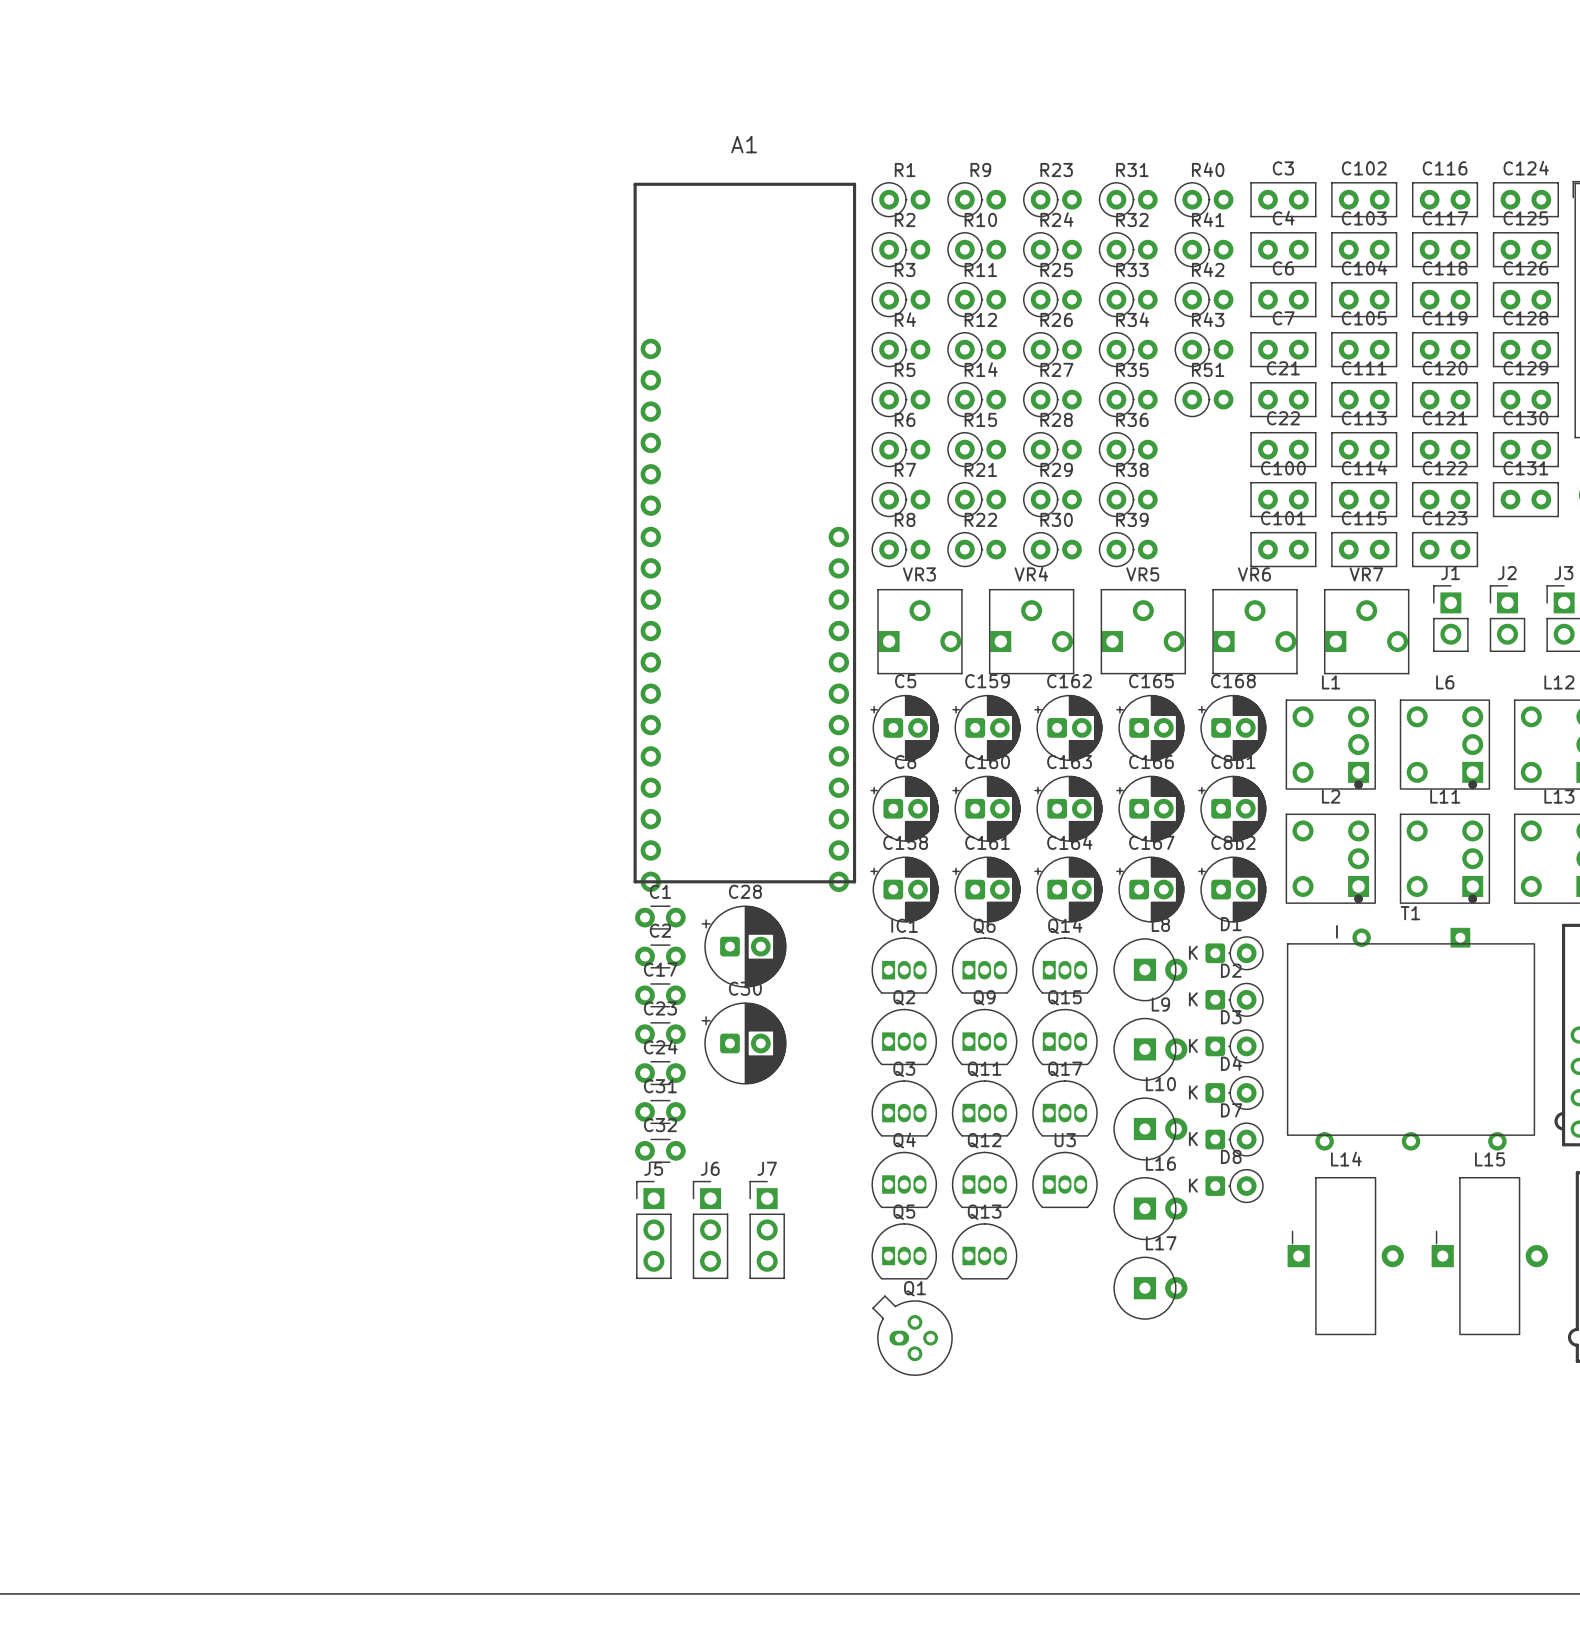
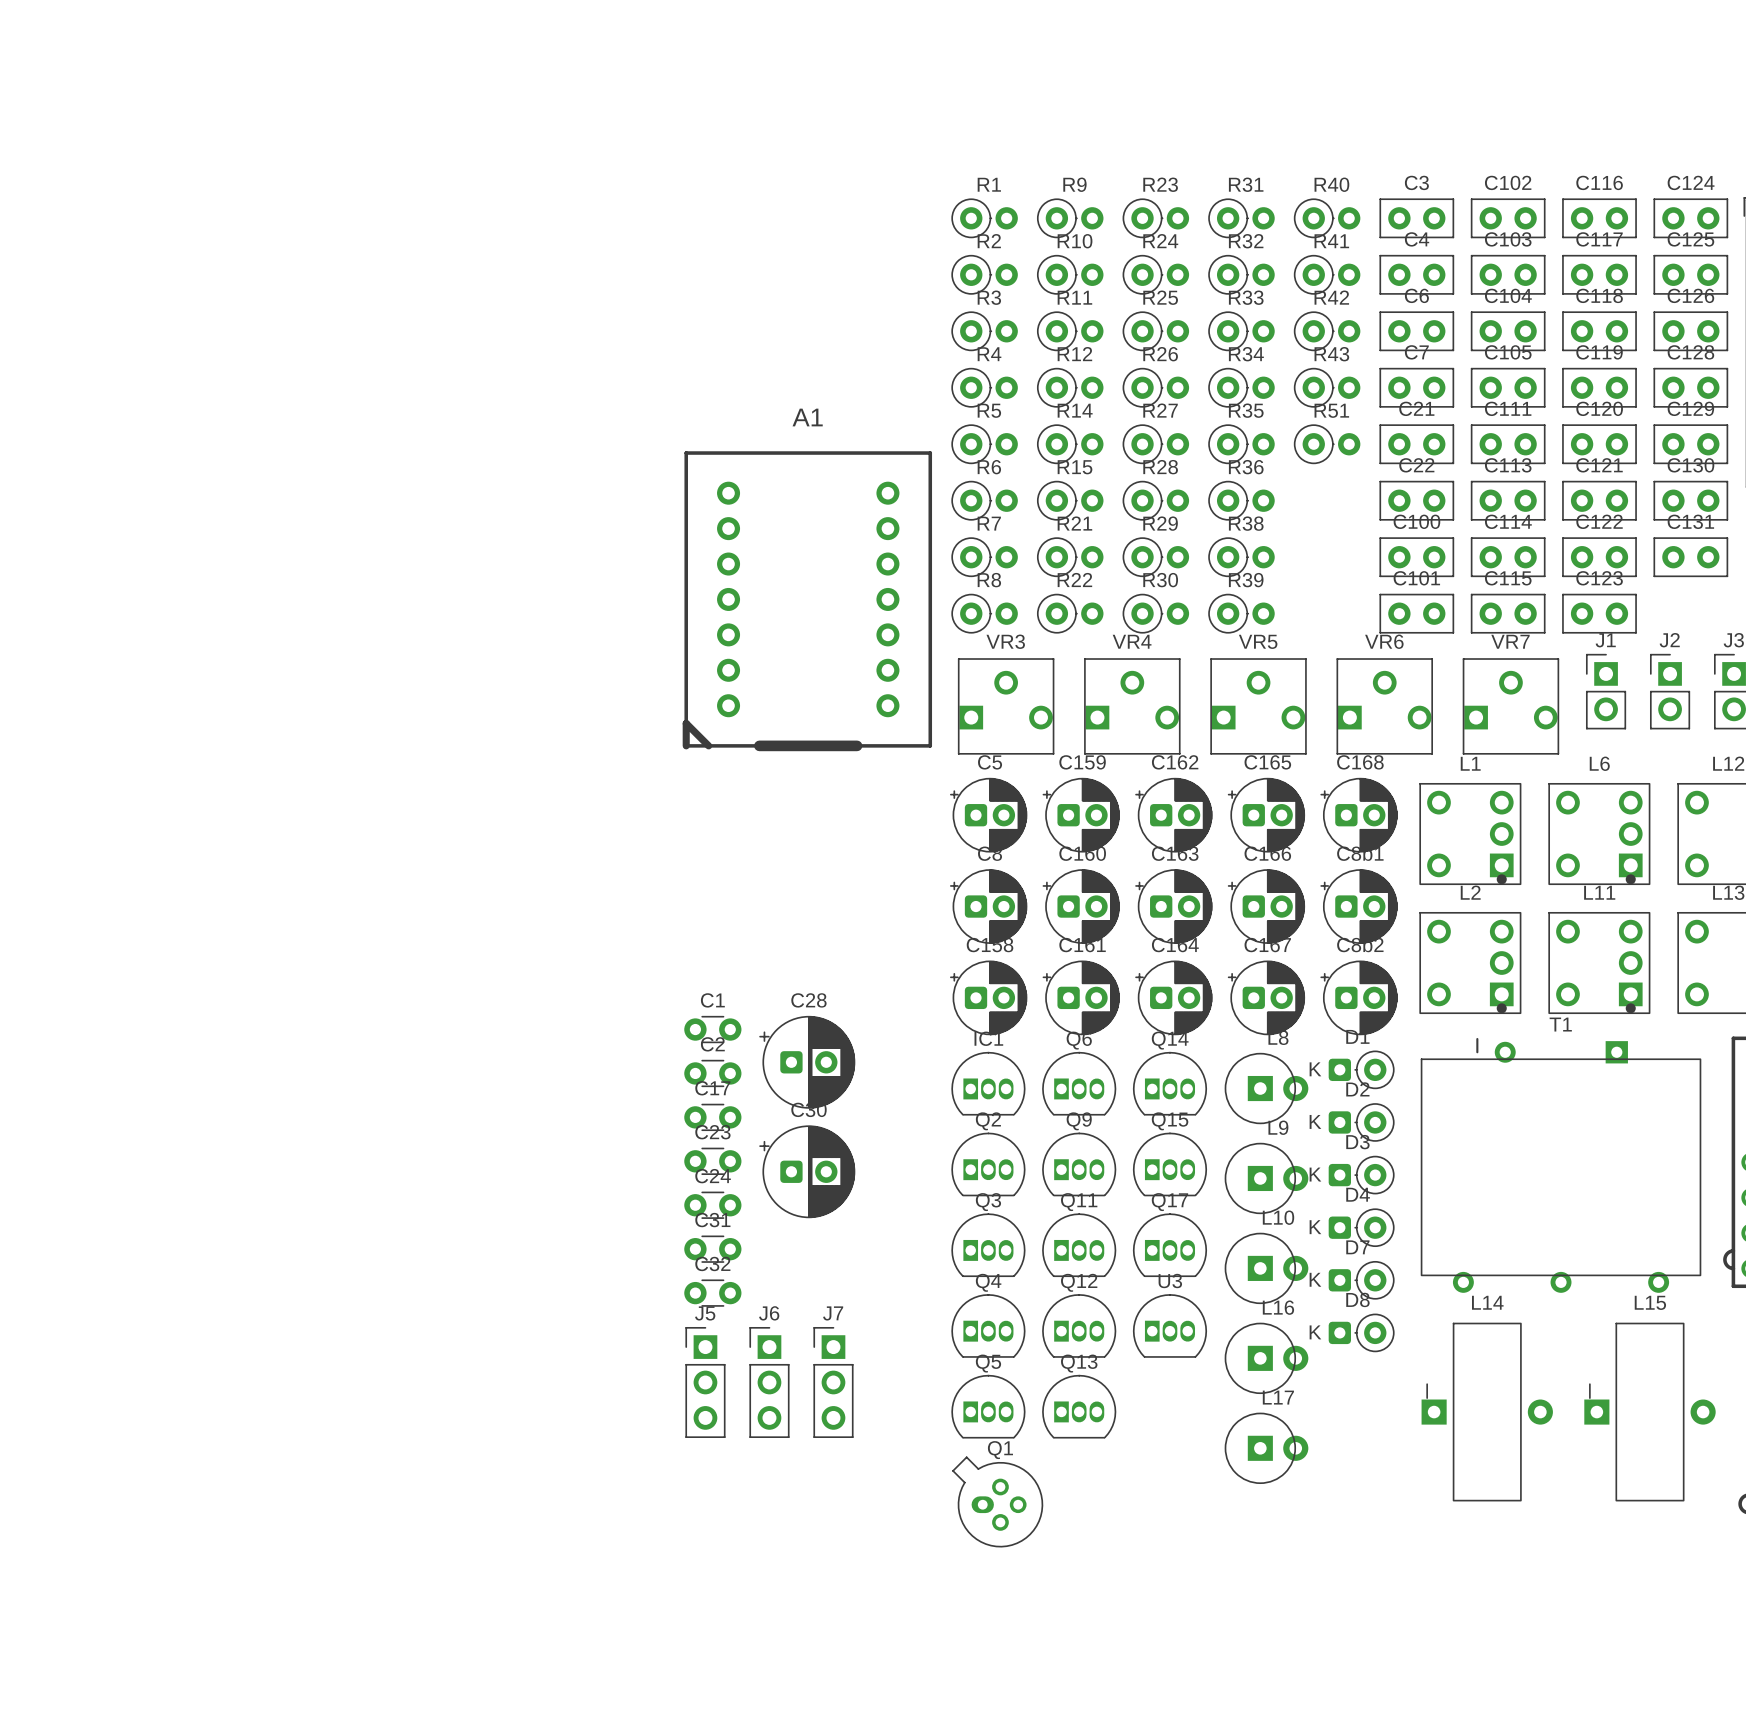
A1 name position: A1 (744, 144) -> A1 (807, 417)
A1 footprint: [633, 182, 857, 892] -> [682, 451, 933, 752]

